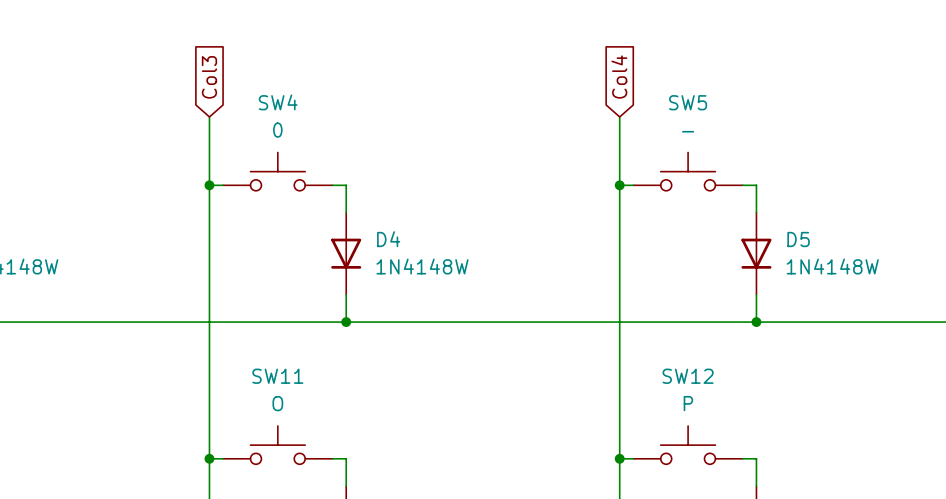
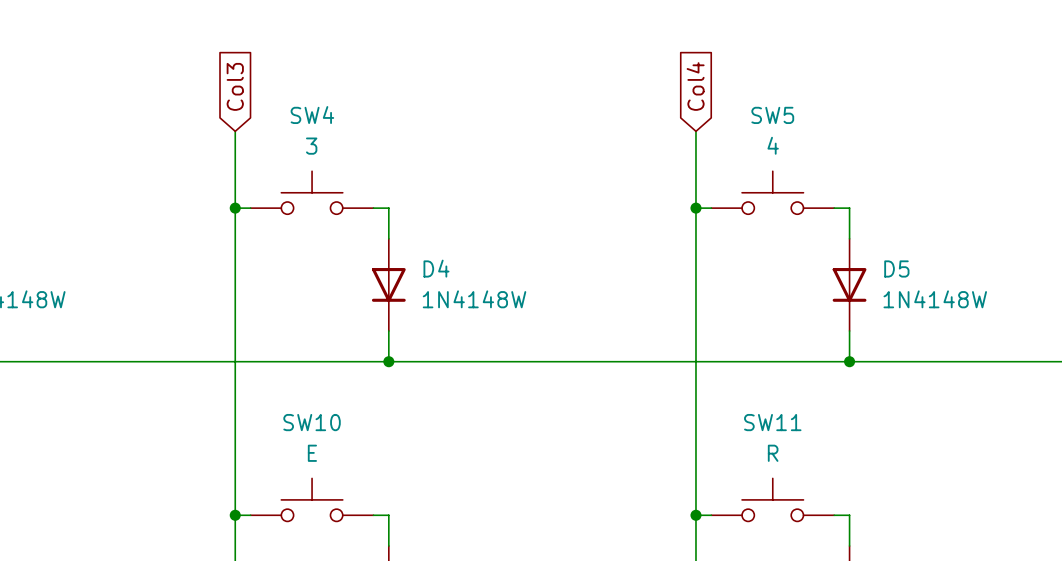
SW4 value: 0 (277, 130) -> 3 (311, 146)
SW5 value: - (688, 131) -> 4 (773, 145)
SW11 name: SW11 (277, 376) -> SW10 (312, 422)
SW12 name: SW12 (688, 376) -> SW11 (772, 422)
SW11 value: O (277, 403) -> E (312, 453)
SW12 value: P (688, 403) -> R (773, 453)

